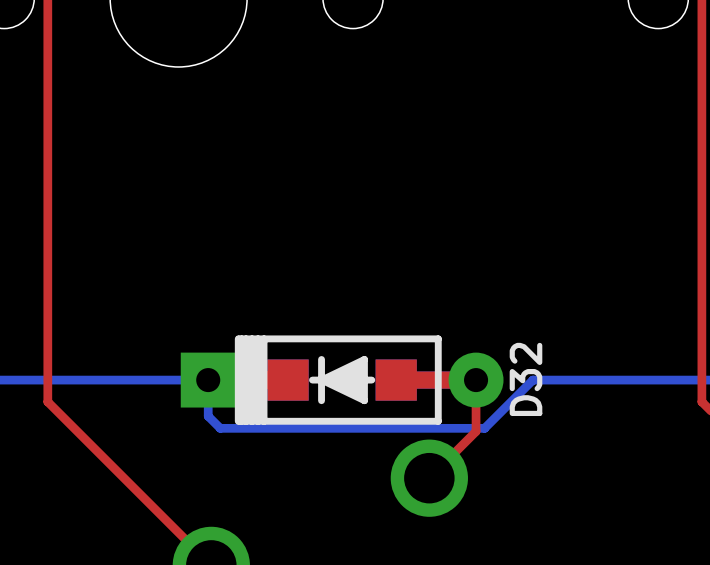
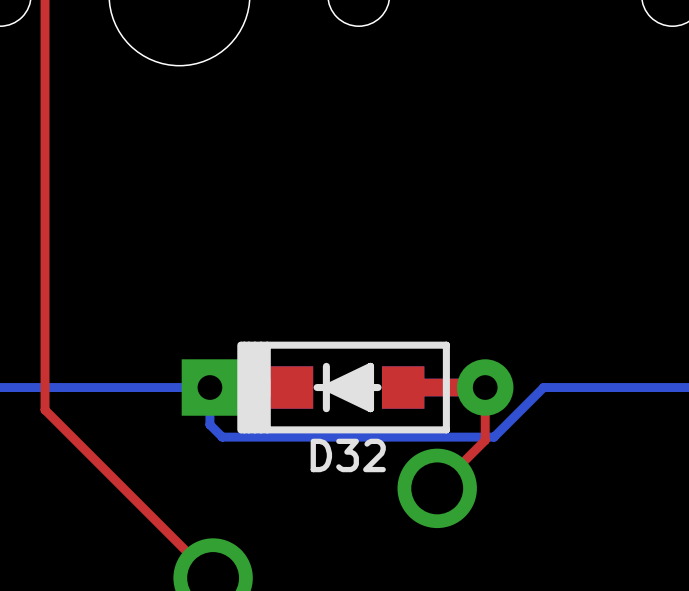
D32 name rotation: 0° (526, 379) -> 90° clockwise (348, 455)
D32 name position: D32 (526, 379) -> D32 (348, 455)

